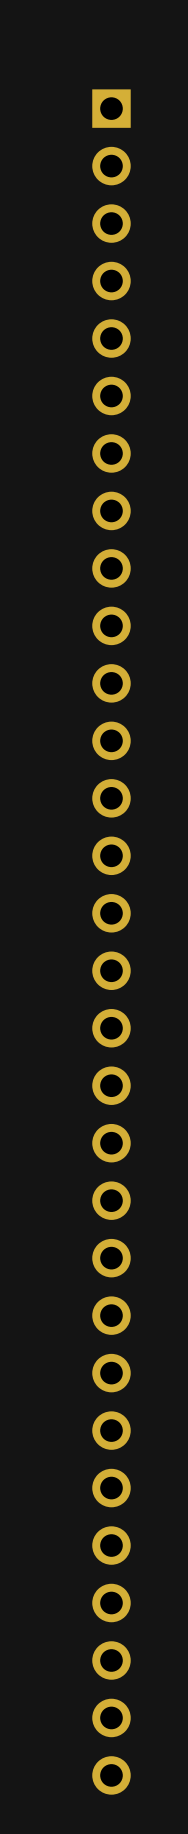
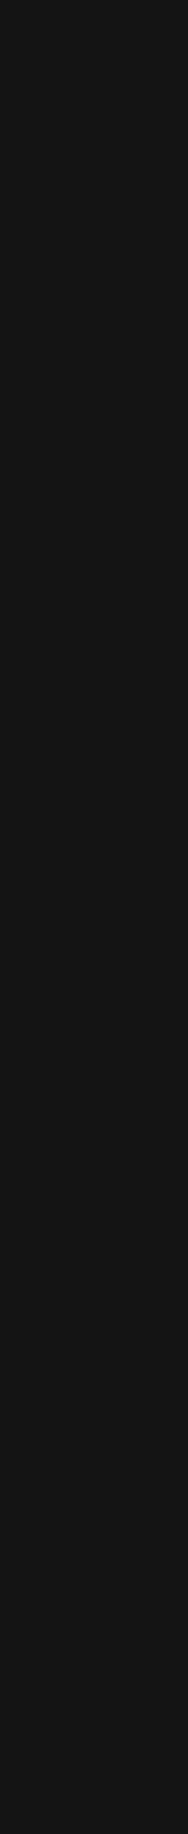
part: (111, 942) -> none

